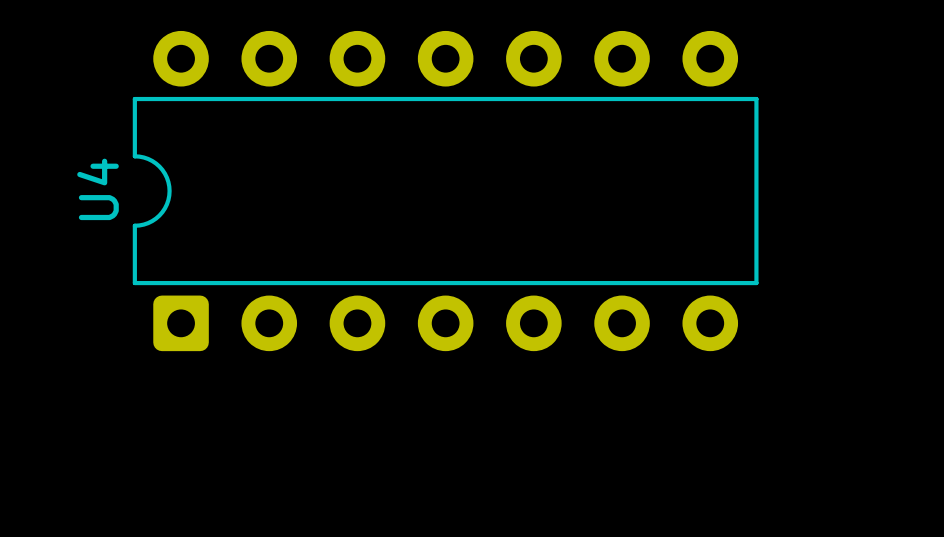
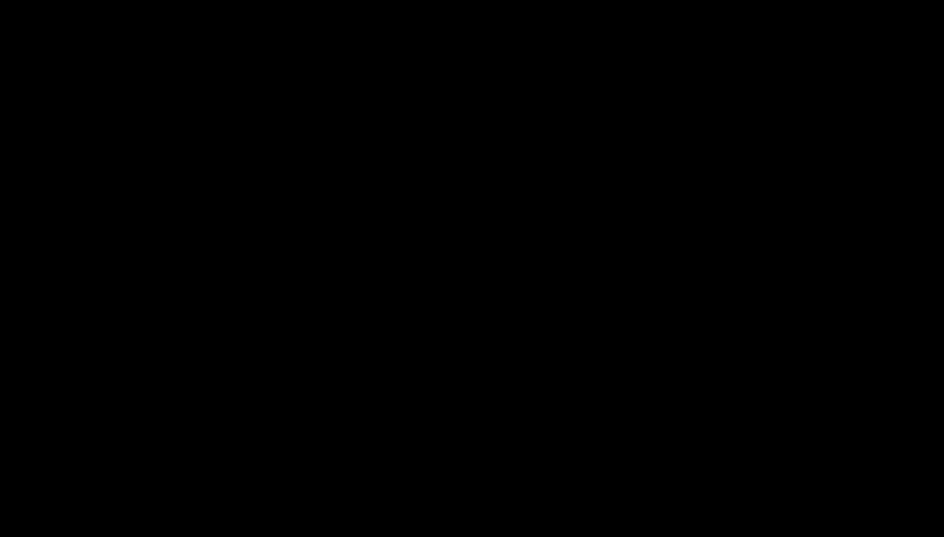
U4: (445, 191) -> none

